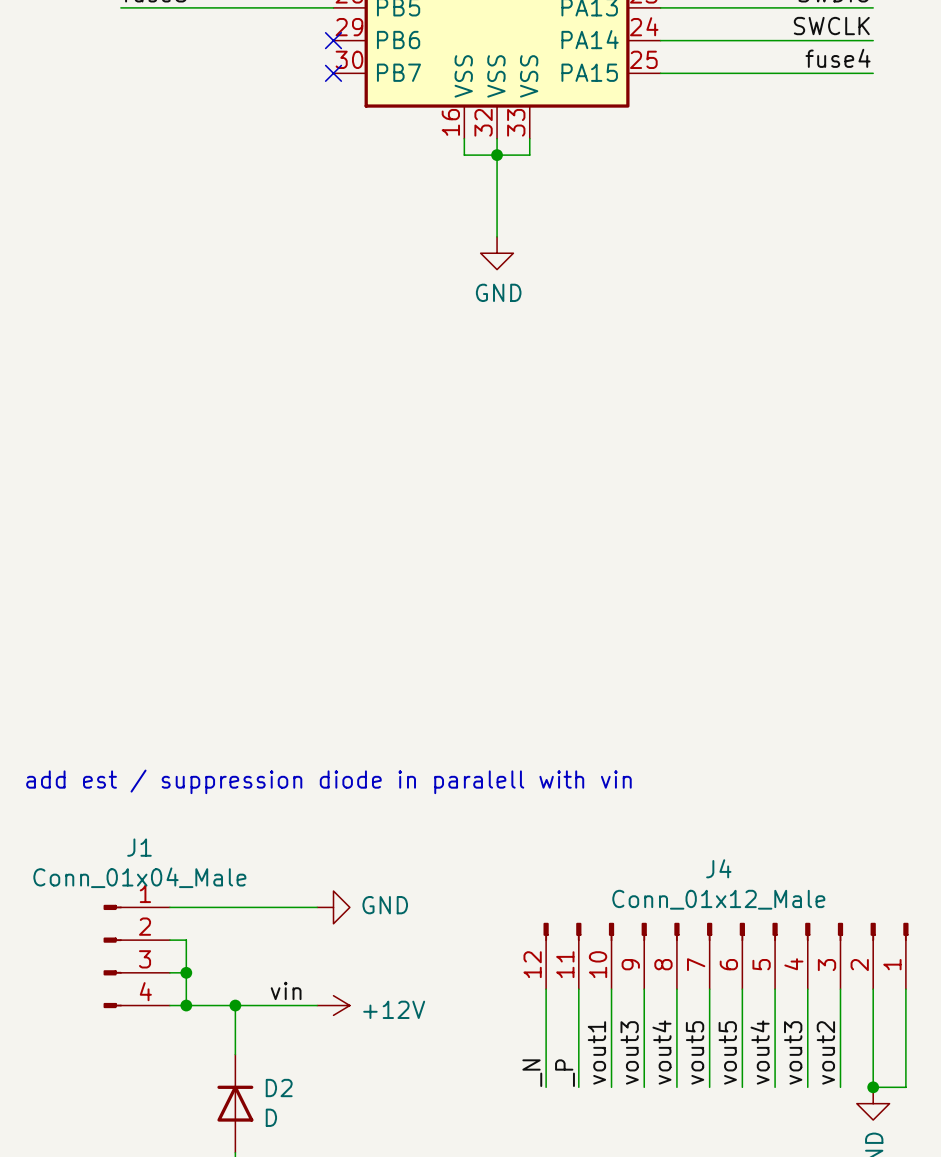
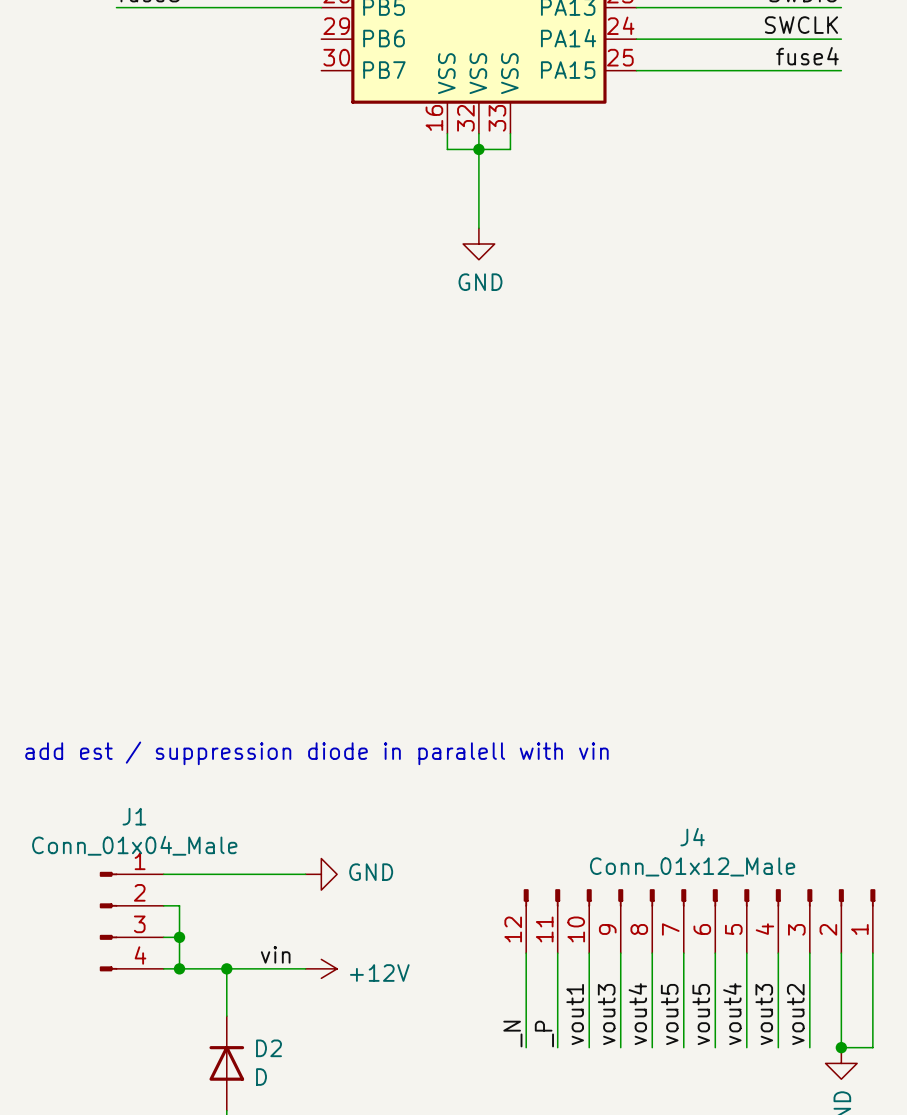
no-connect mark: (333, 40) -> none
no-connect mark: (333, 73) -> none

